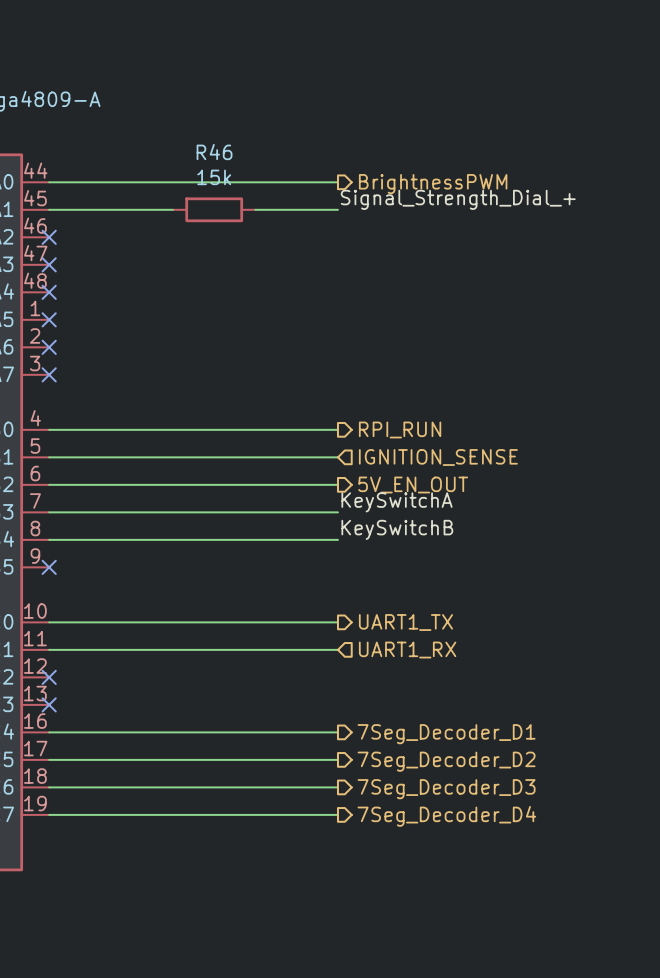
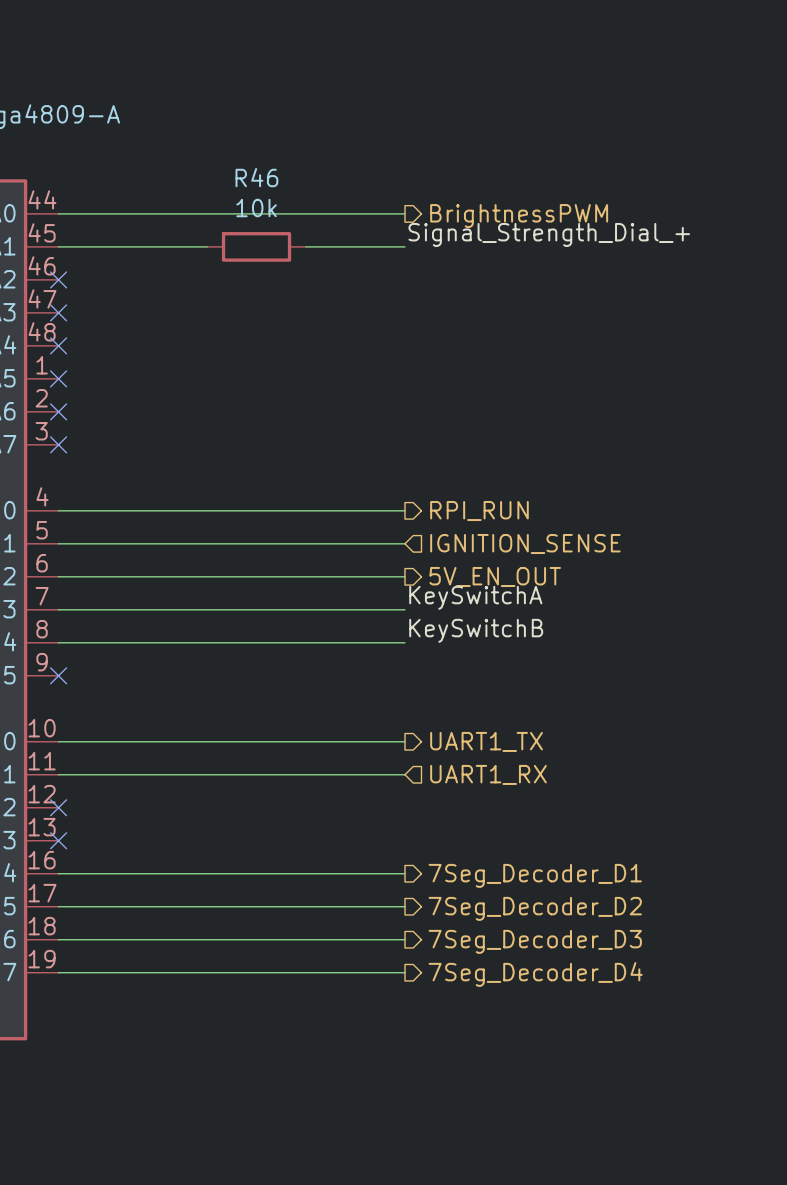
R46 value: 15k (214, 177) -> 10k (256, 208)

